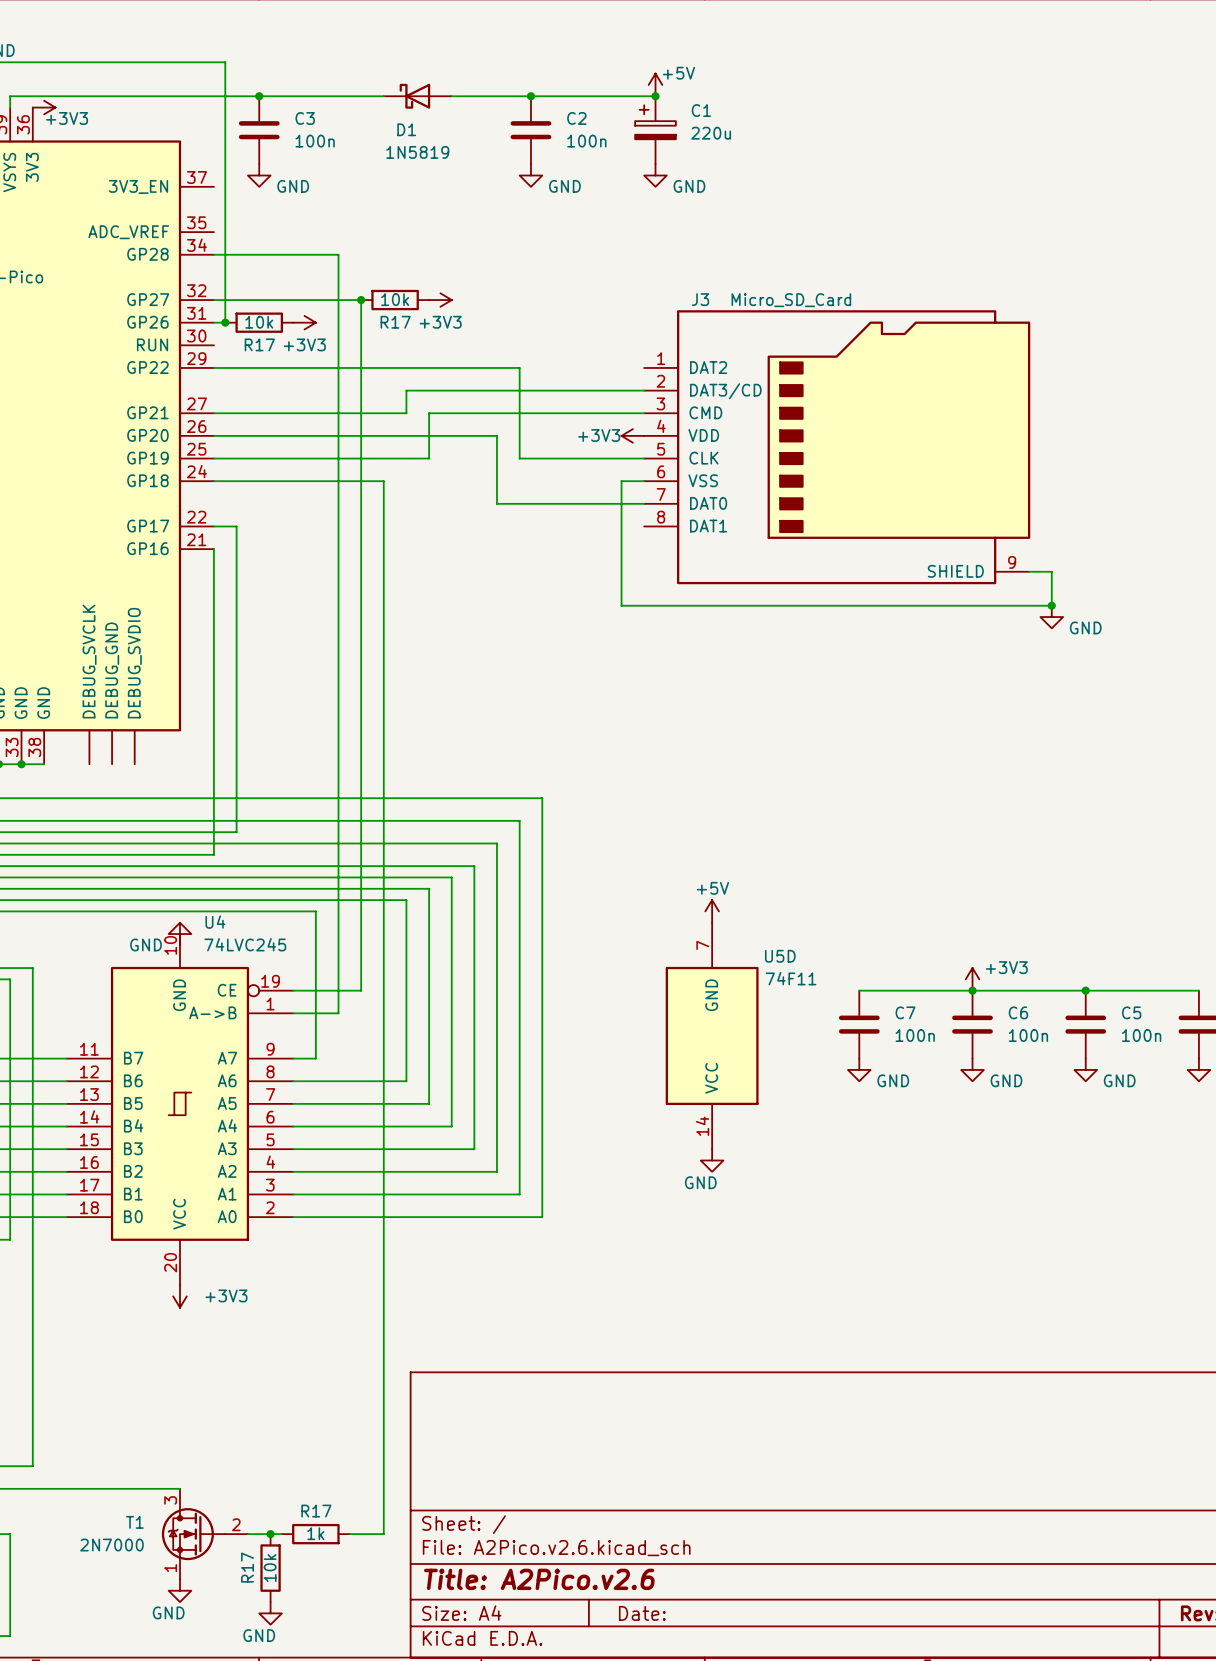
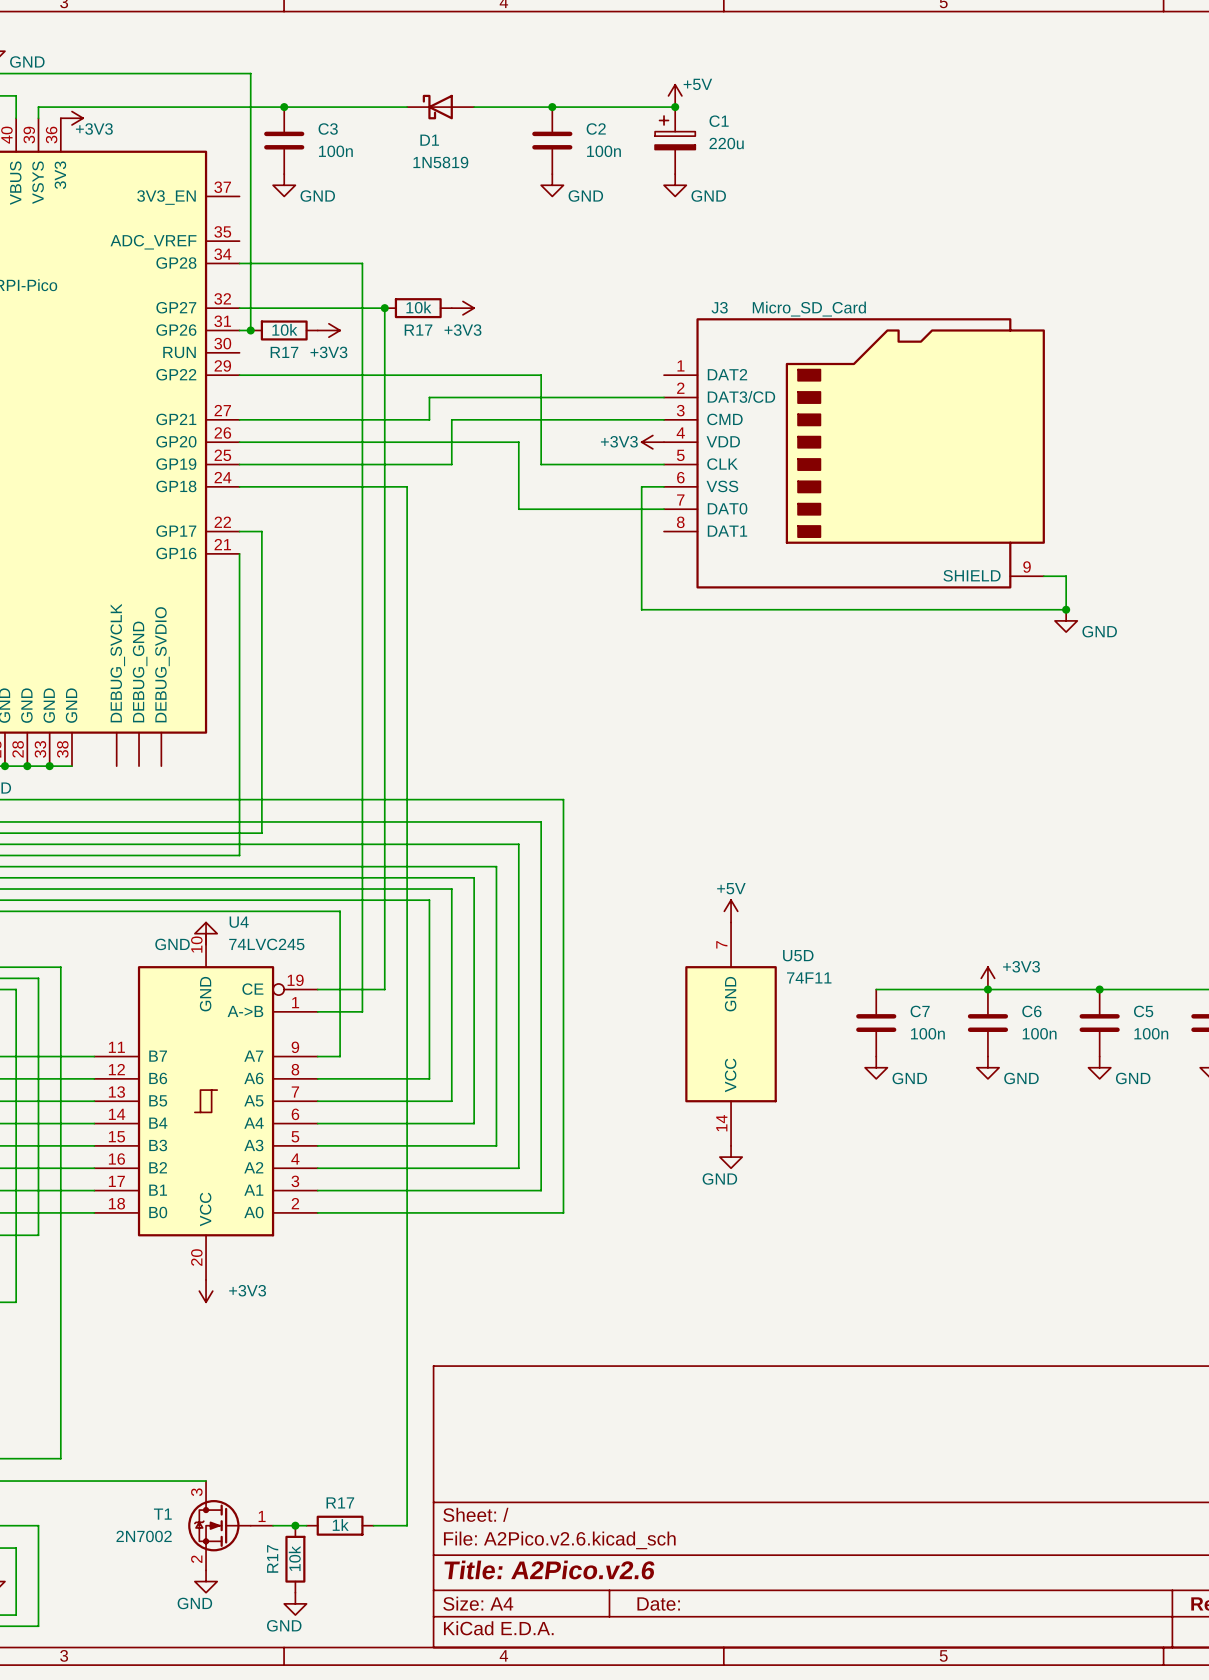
T1 pin number: 2 (236, 1524) -> 1 (262, 1516)
T1 value: 2N7000 (111, 1545) -> 2N7002 (144, 1536)
T1 pin number: 1 (170, 1568) -> 2 (196, 1559)

